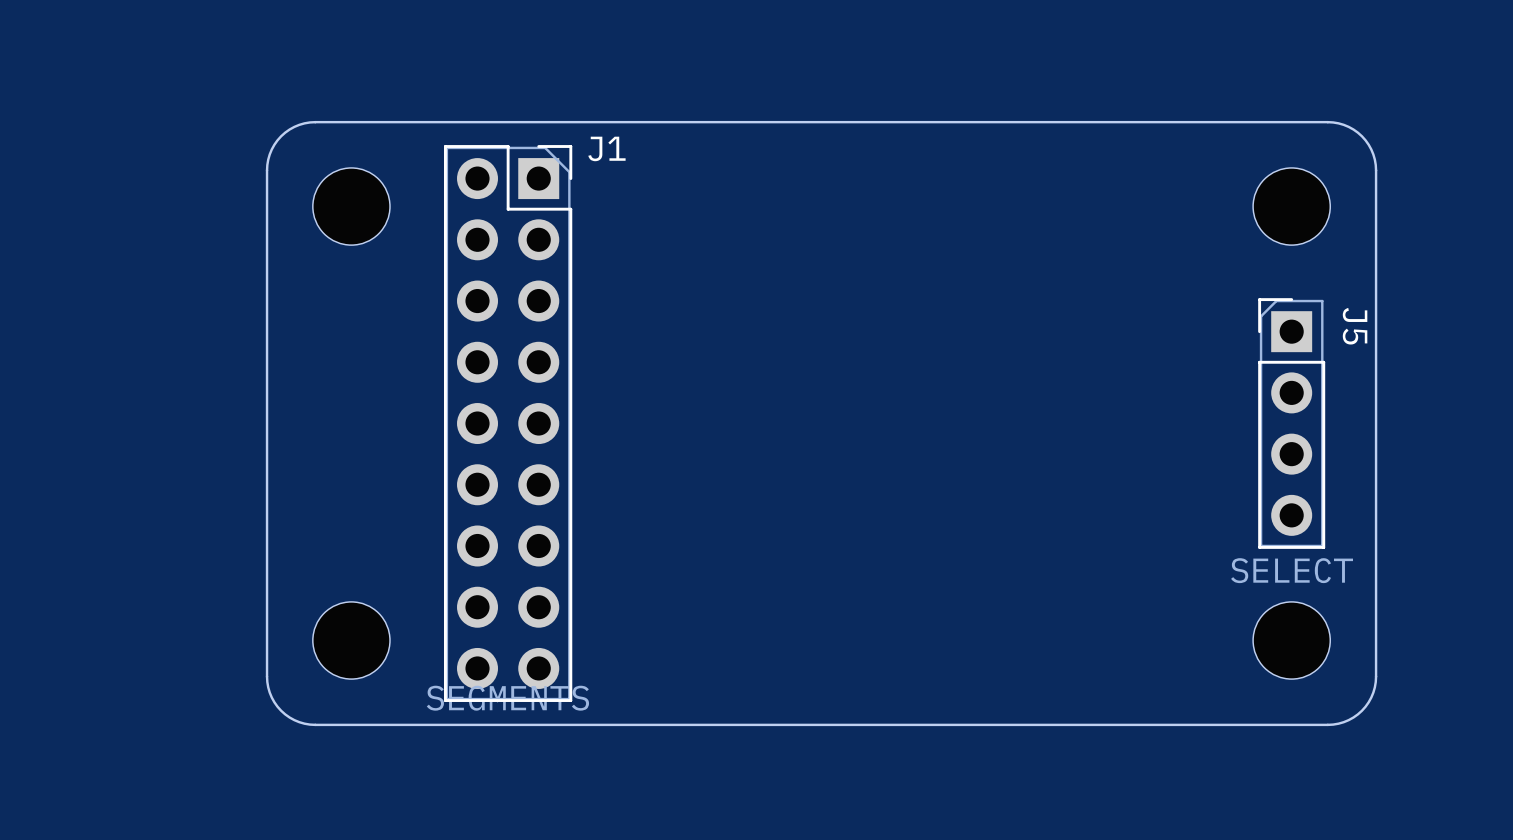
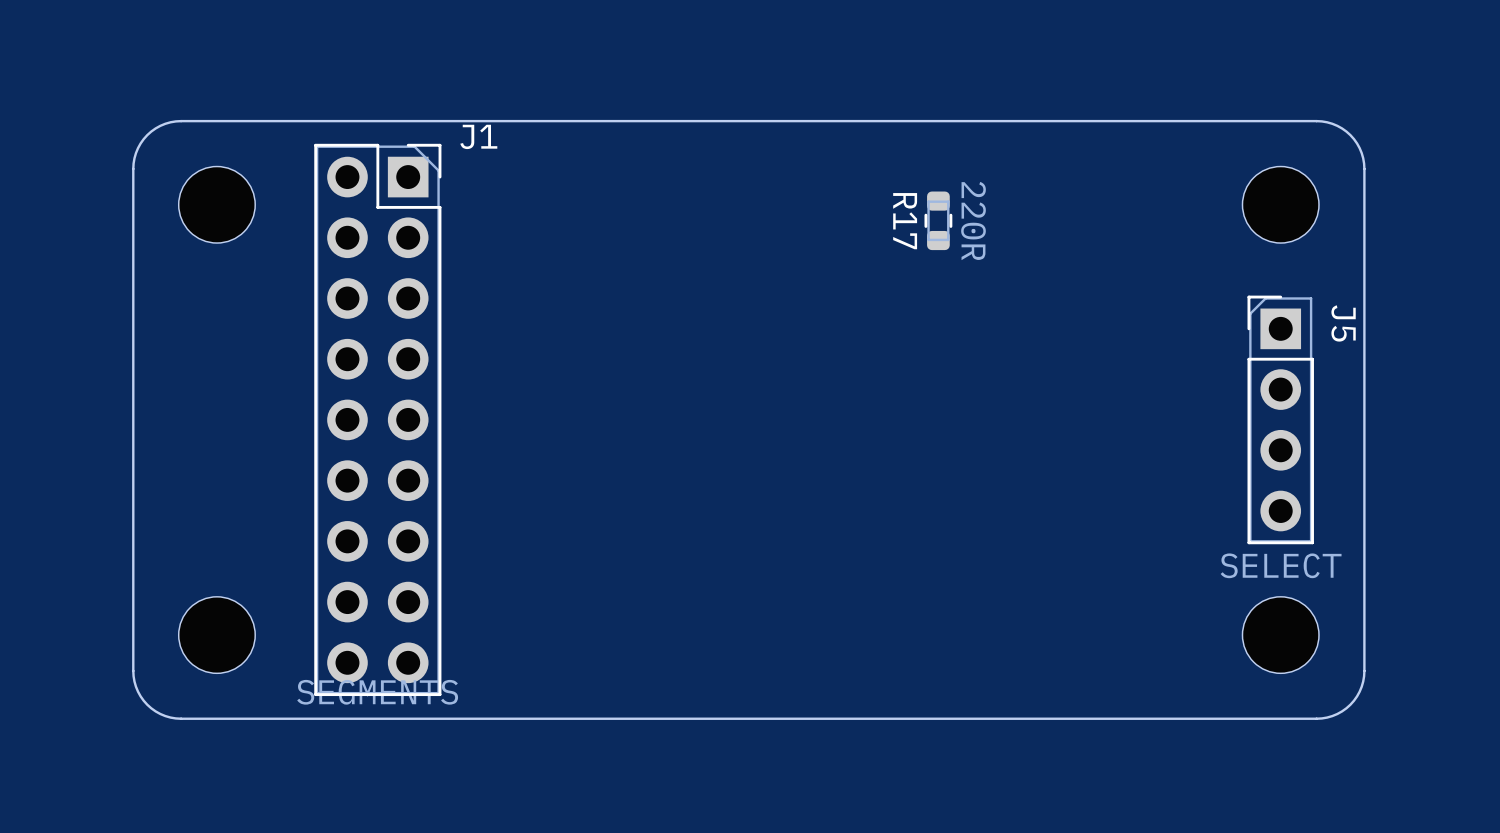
board edge: (315, 122) (294, 126) (281, 136) (269, 154) (267, 170) (267, 682) (271, 697) (281, 710) (294, 720) (315, 724) -> (312, 121) (170, 122) (155, 128) (143, 139) (135, 153) (133, 168) (133, 670) (135, 686) (140, 696) (151, 708) (170, 717) (312, 718)
J1 name position: J1 (606, 148) -> J1 (478, 136)
part position: (351, 206) -> (216, 204)
R17: none -> 220R (938, 220)
J1 position: (508, 423) -> (377, 419)
part position: (351, 640) -> (216, 635)

